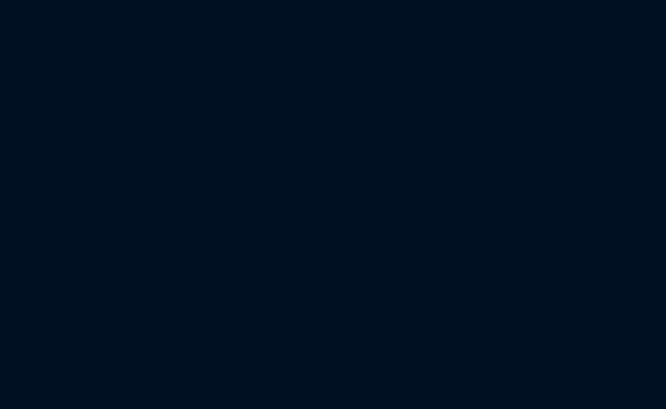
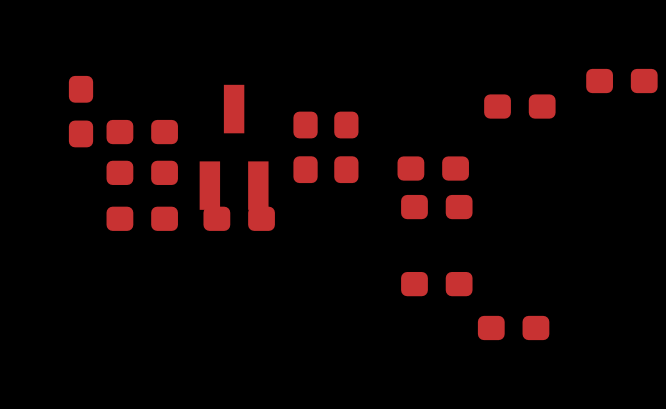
part: none -> (621, 81)
part: none -> (519, 106)
part: none -> (81, 111)
part: none -> (142, 132)
part: none -> (234, 147)
part: none -> (305, 147)
part: none -> (346, 147)
part: none -> (433, 168)
part: none -> (142, 172)
part: none -> (436, 207)
part: none -> (142, 218)
part: none -> (239, 218)
part: none -> (436, 284)
part: none -> (513, 327)

